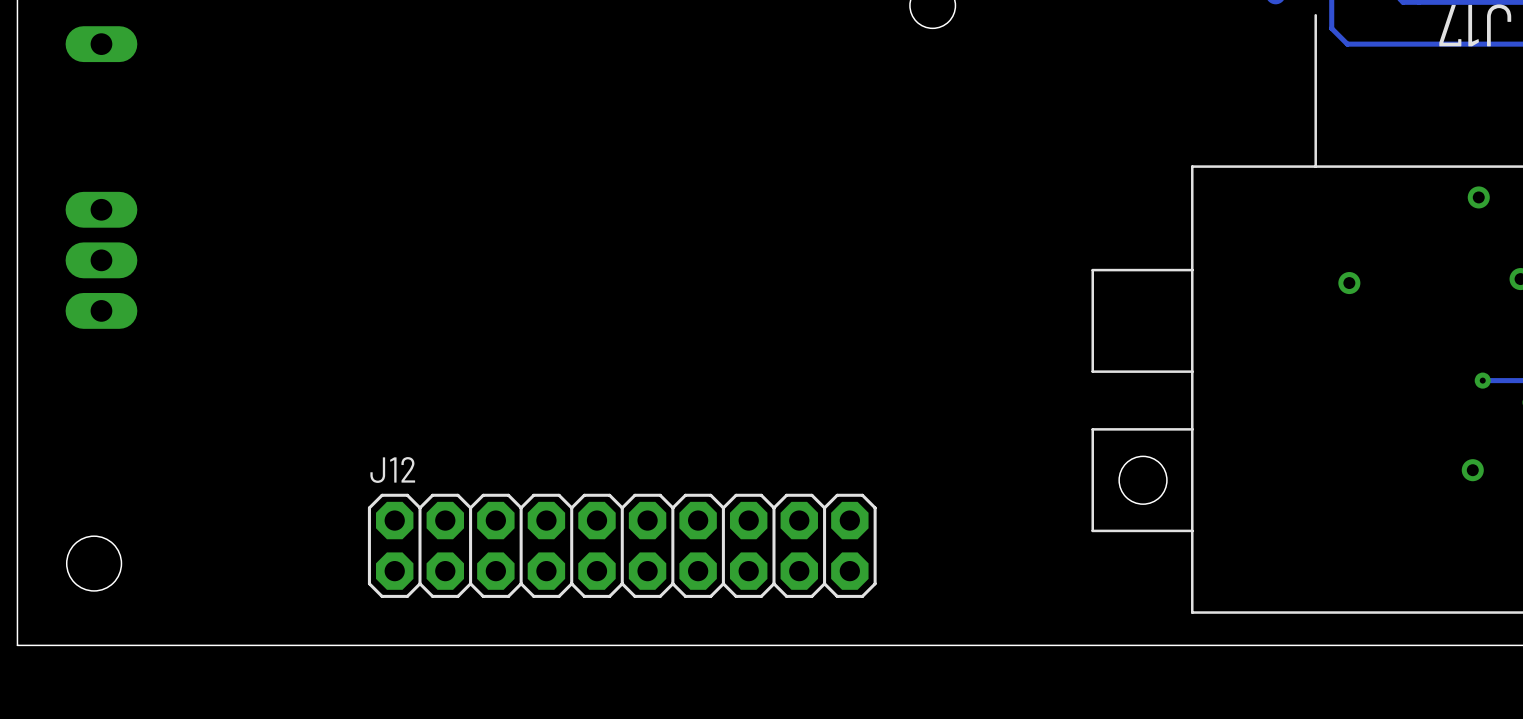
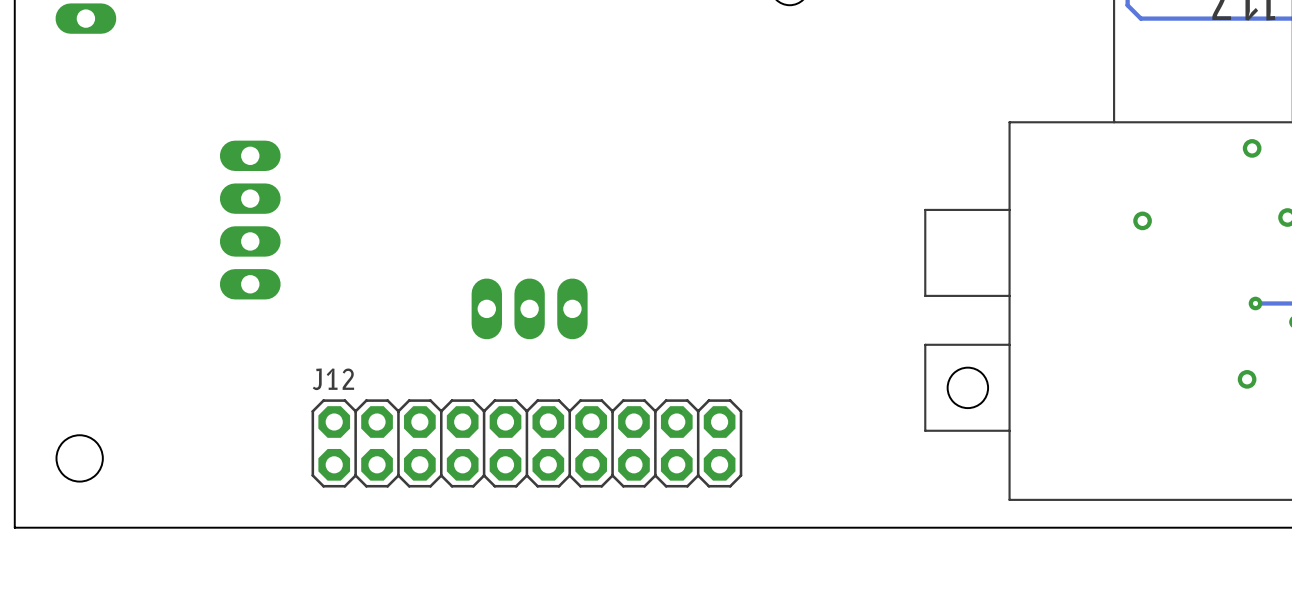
part: (101, 260) -> none
part: none -> (250, 220)
part: none -> (529, 308)

